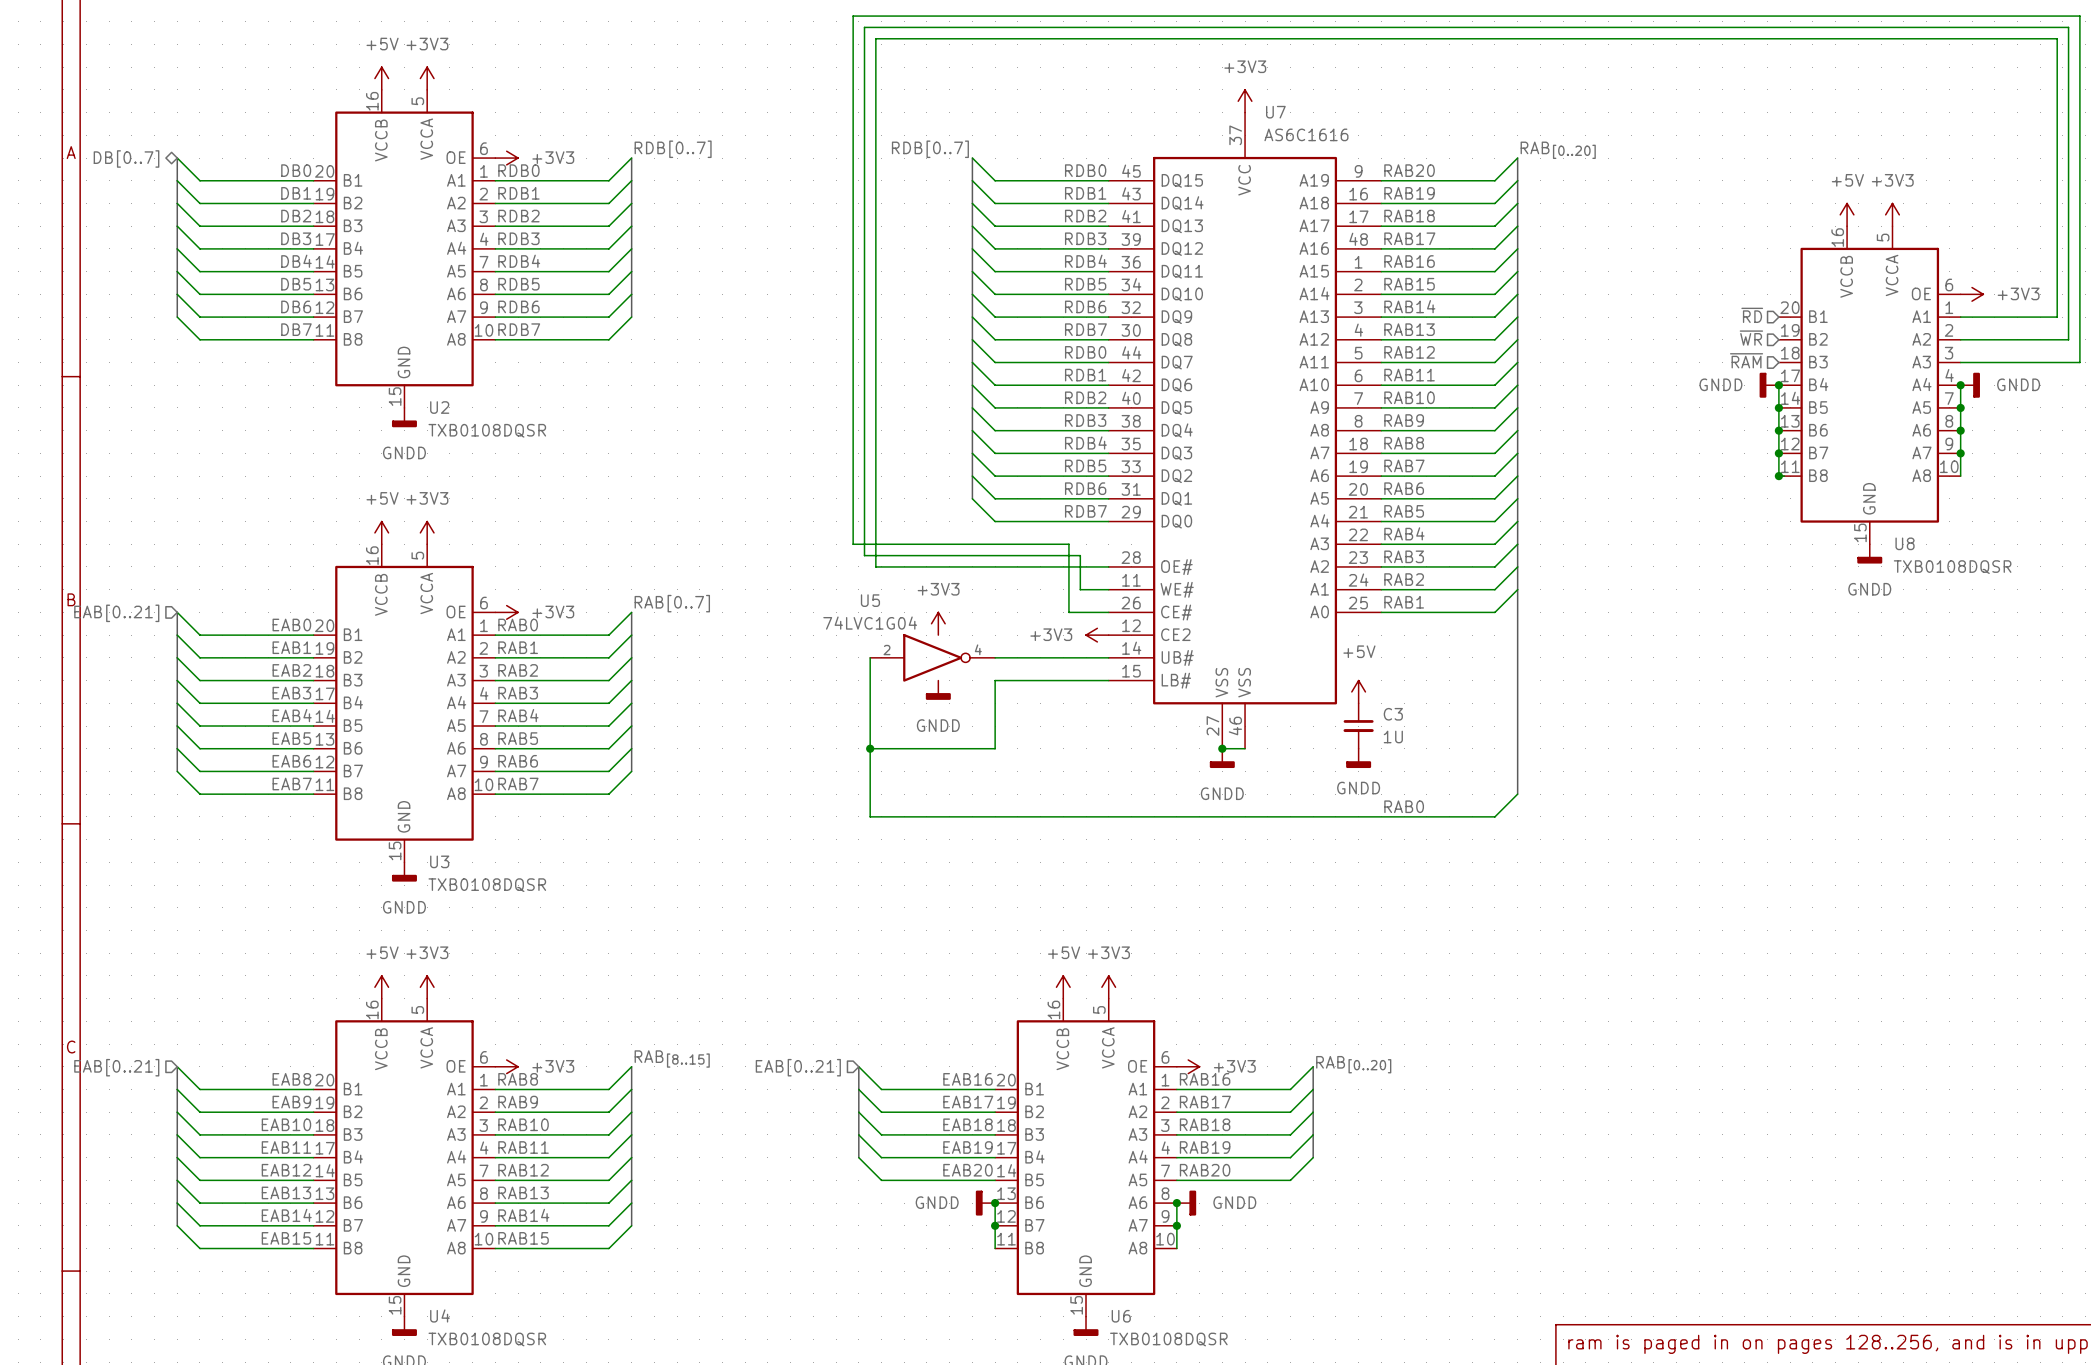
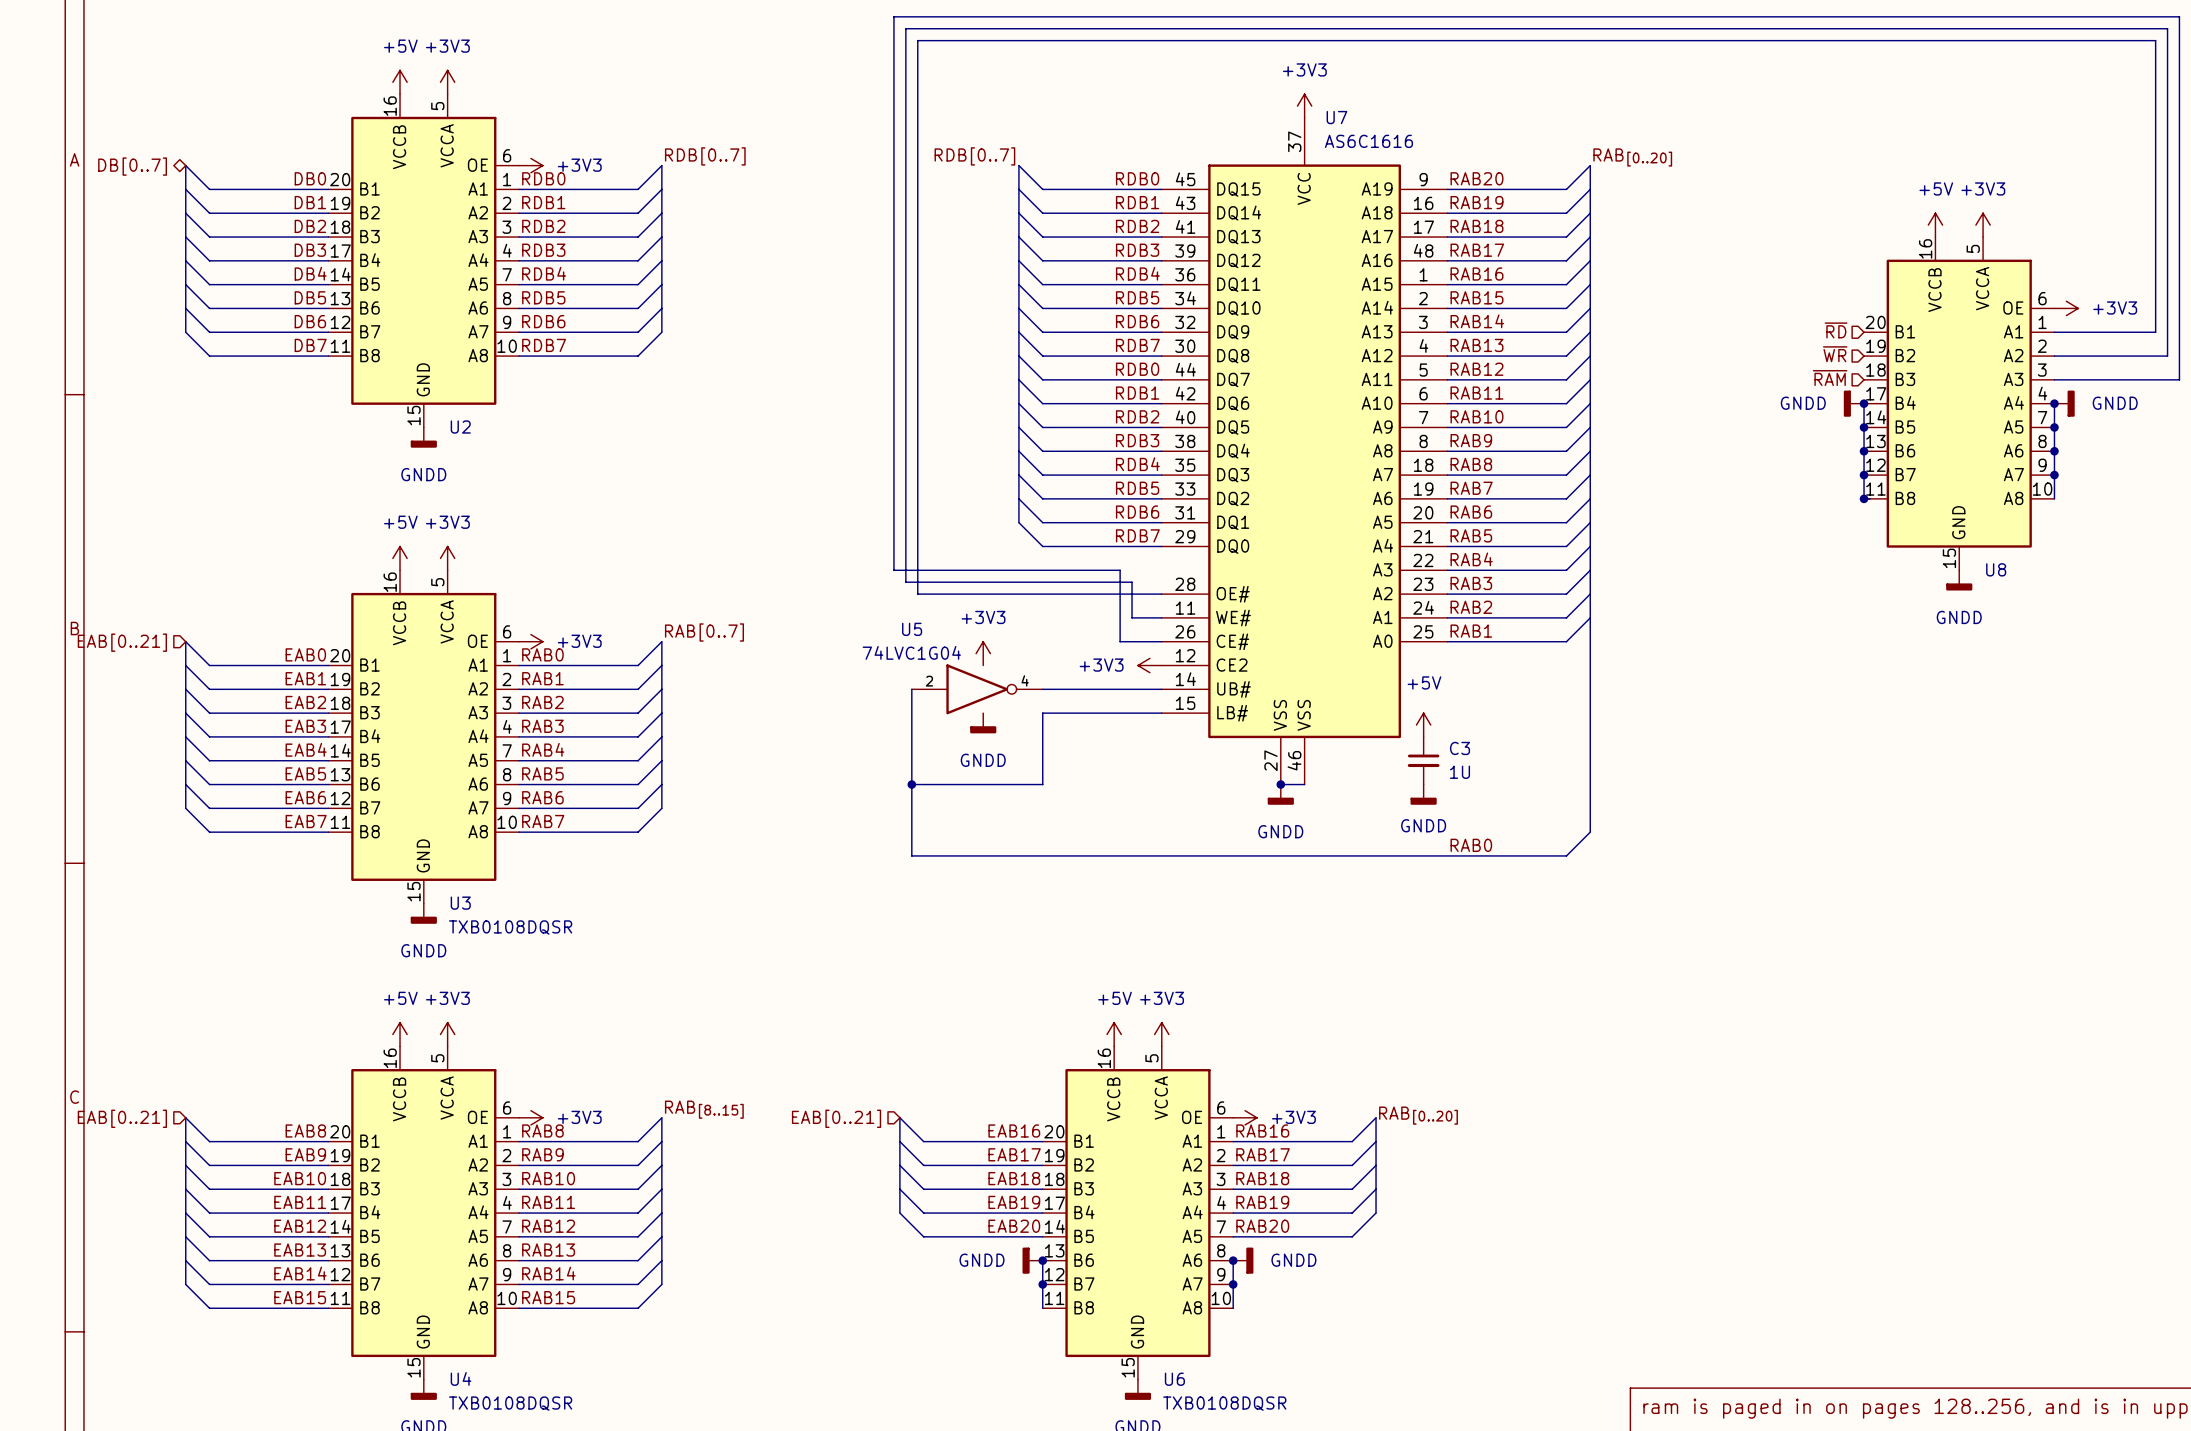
U2 value: TXB0108DQSR (487, 430) -> none
U8 value: TXB0108DQSR (1952, 567) -> none

